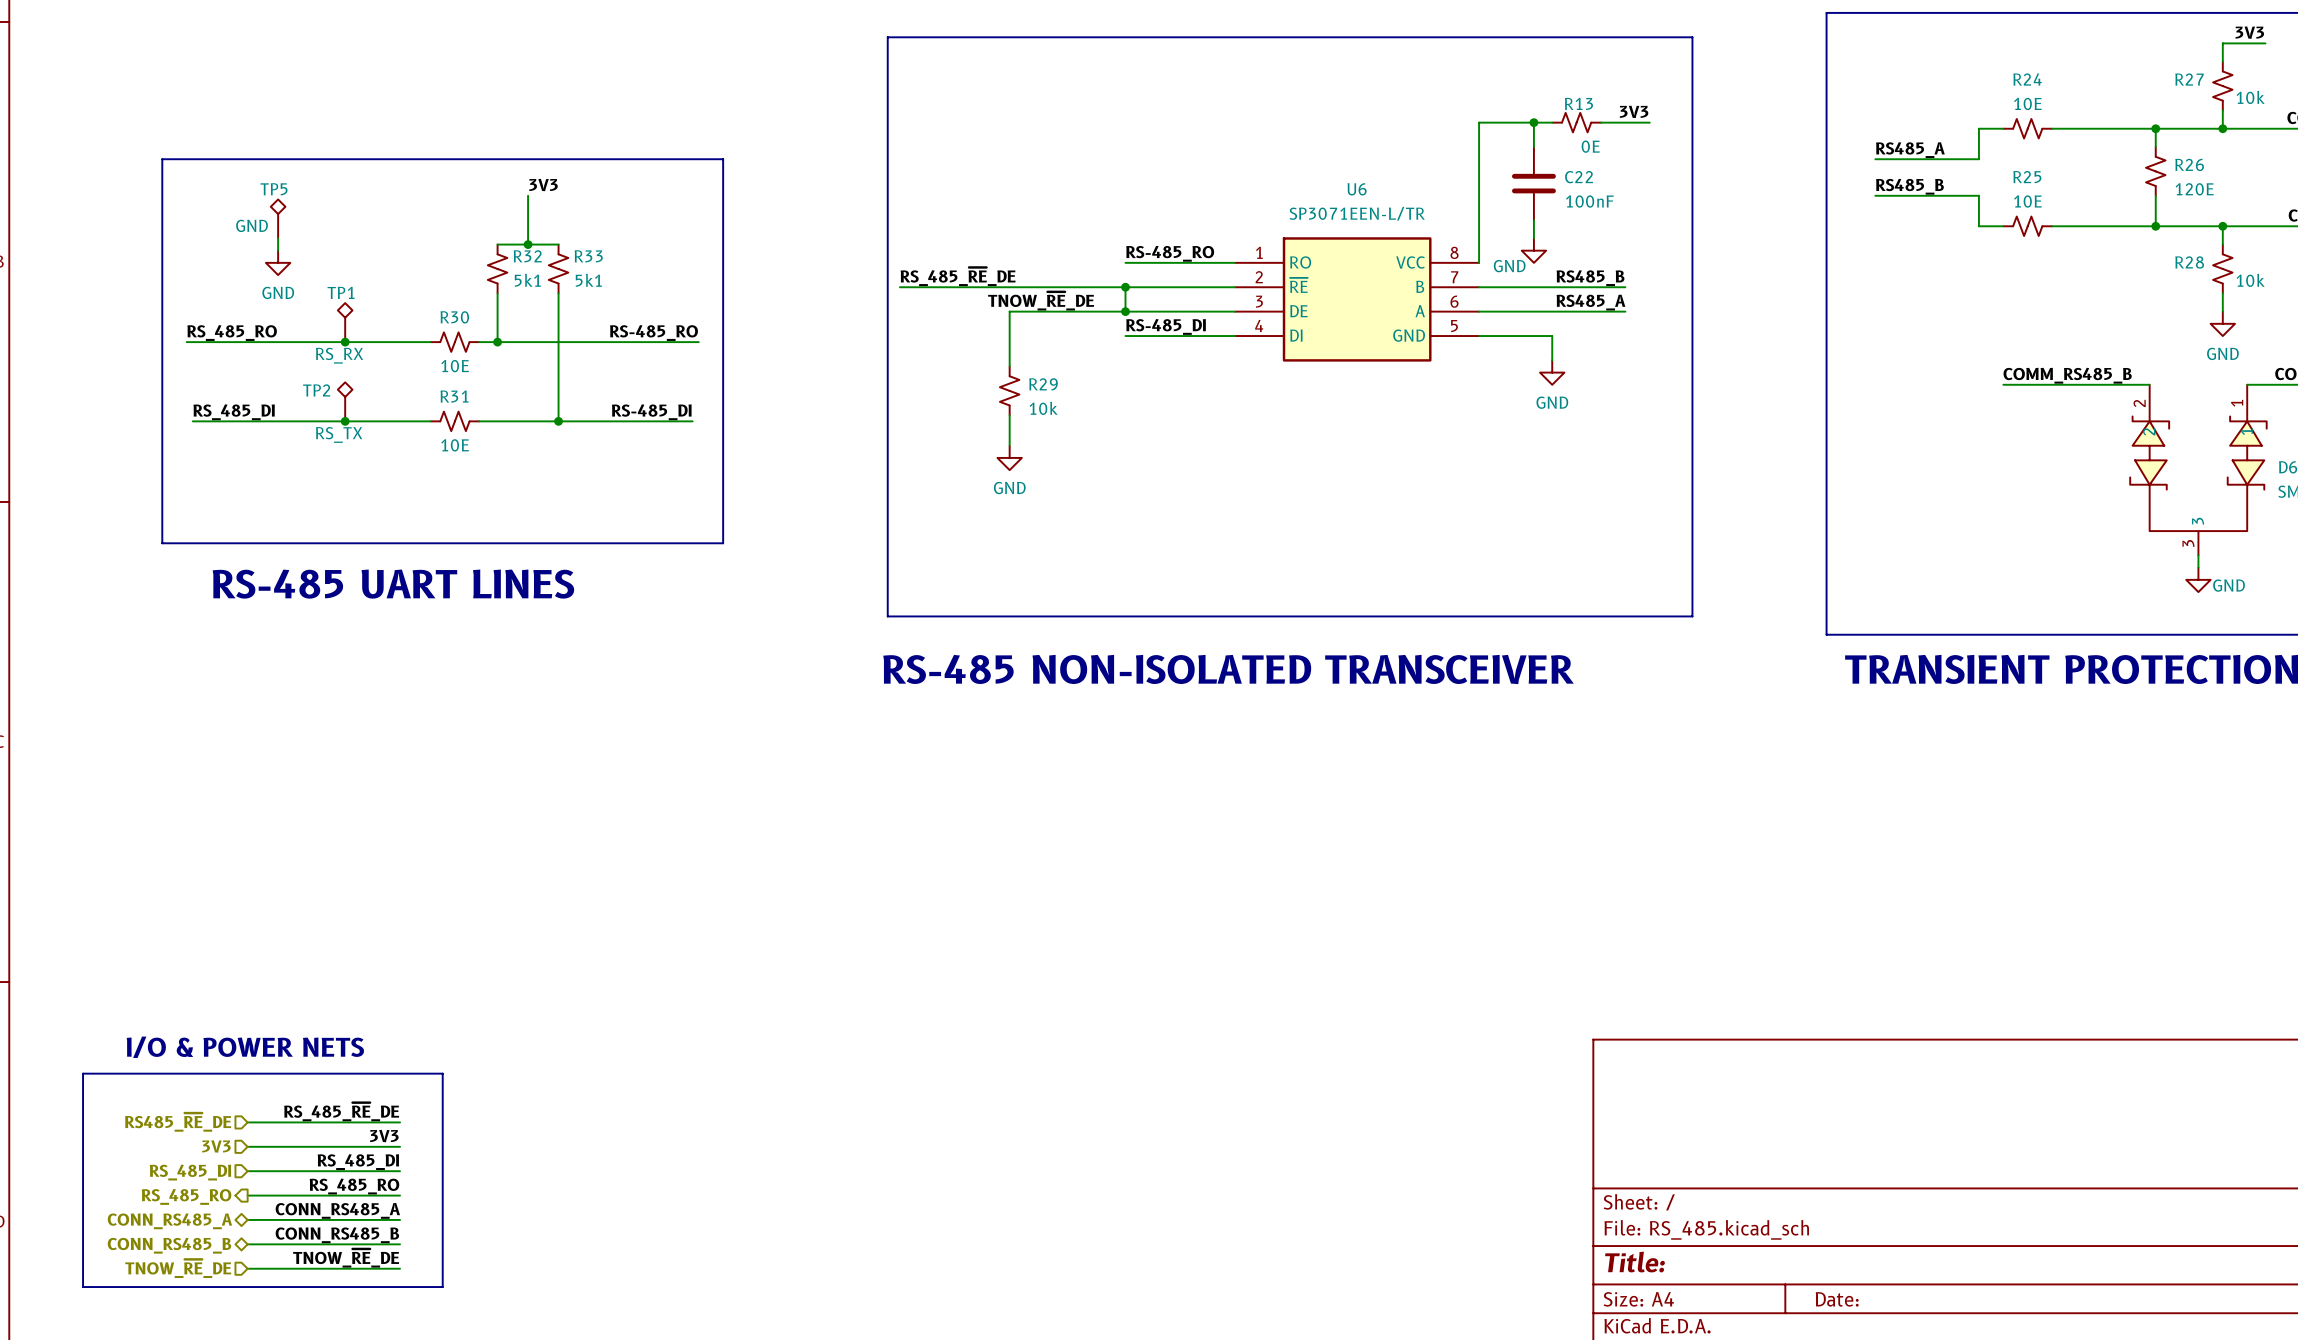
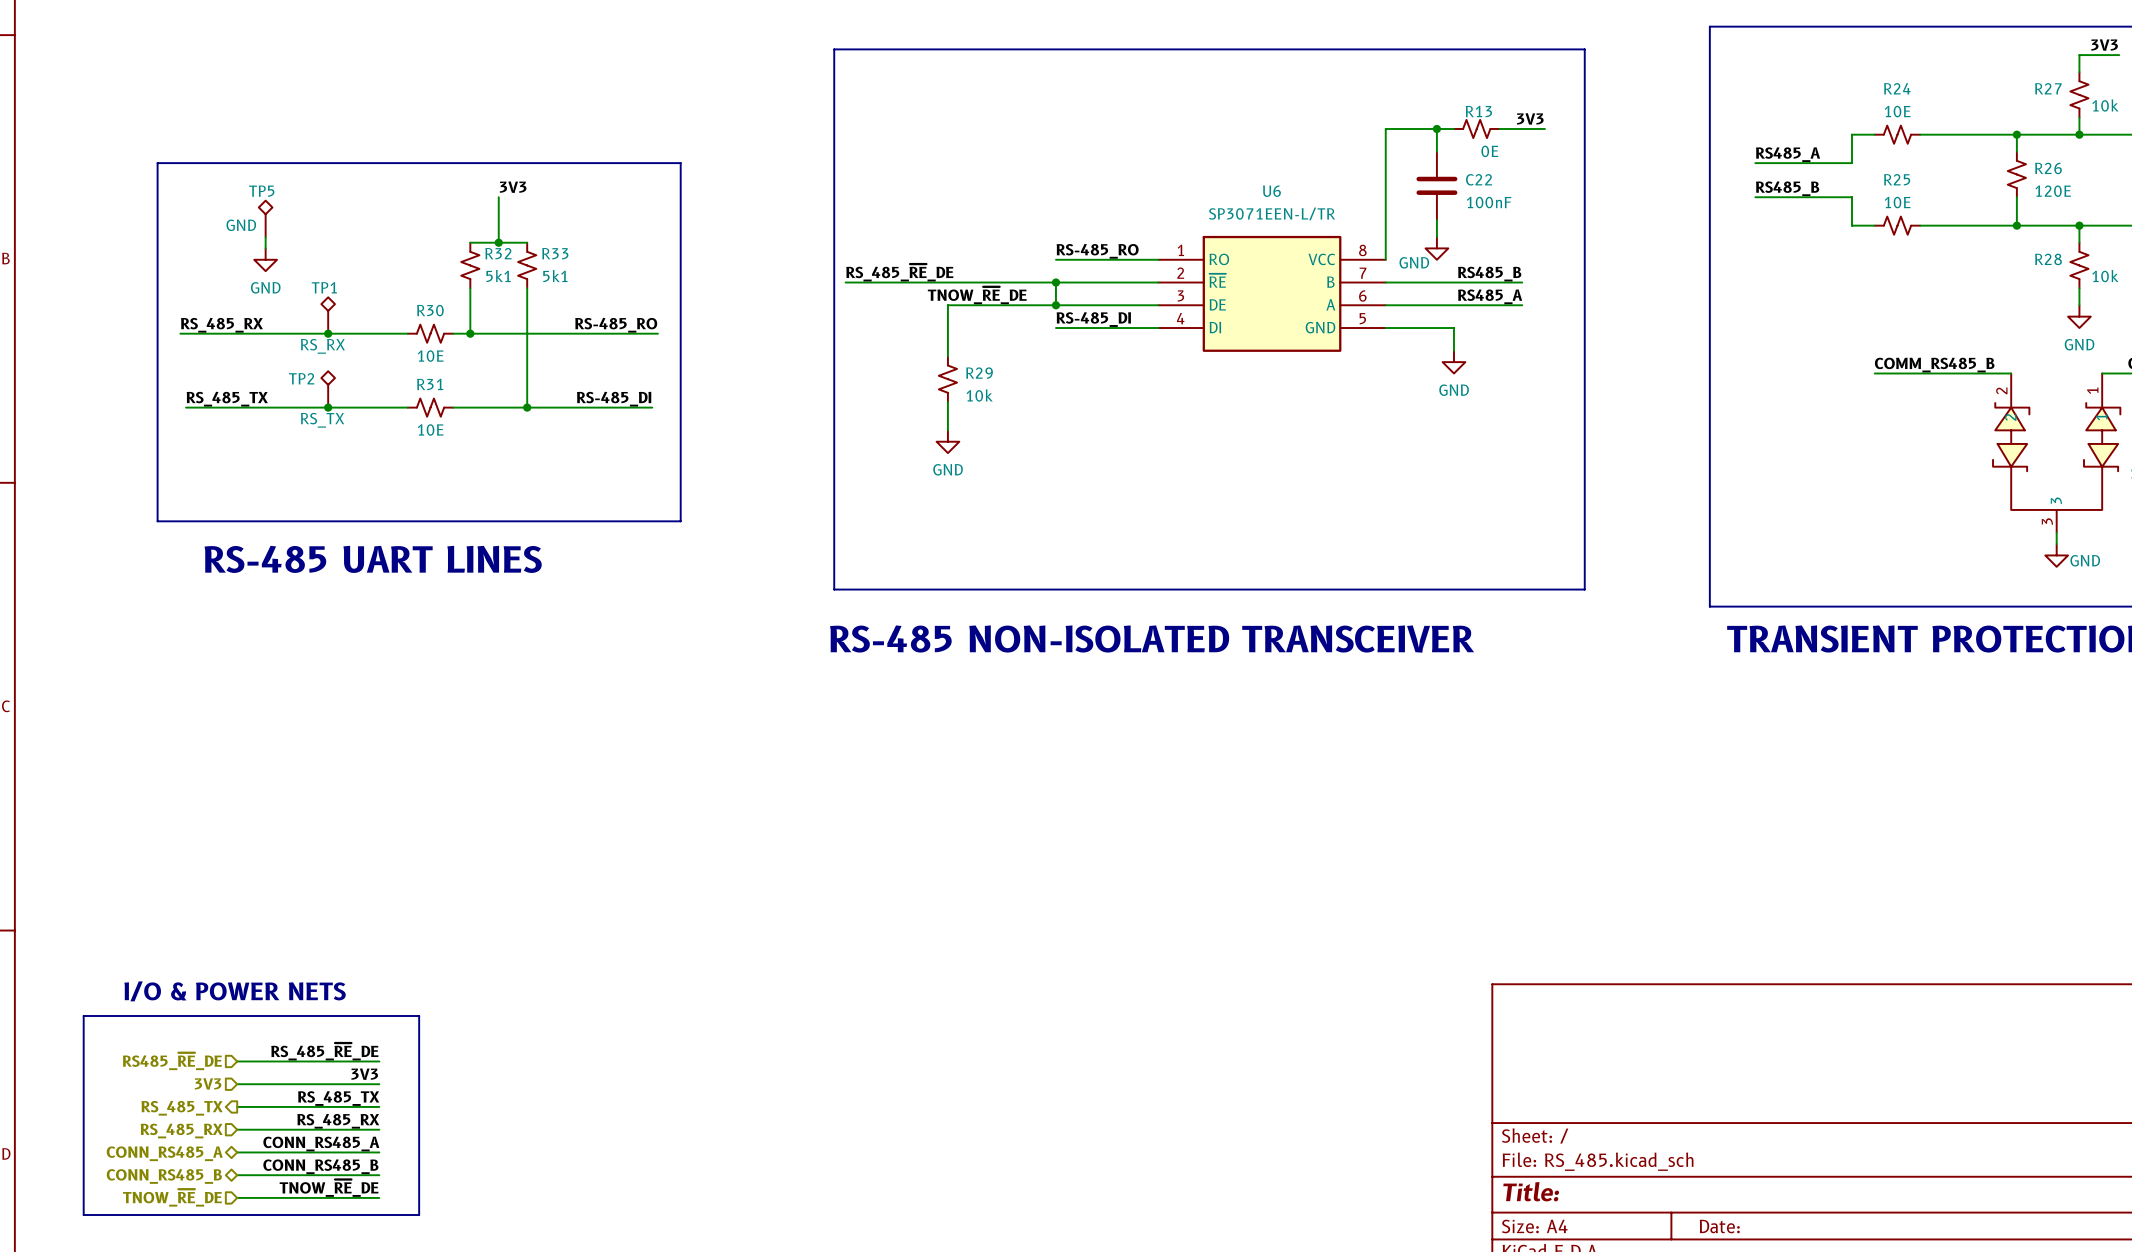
label: RS_485_RO (232, 333) -> RS_485_RX (221, 325)
label: RS_485_DI (234, 412) -> RS_485_TX (227, 399)
label: RS_485_DI (358, 1162) -> RS_485_TX (338, 1098)
hierarchical label shape: input (190, 1172) -> output (182, 1108)
hierarchical label: RS_485_DI (190, 1172) -> RS_485_TX (182, 1108)
label: RS_485_RO (354, 1186) -> RS_485_RX (338, 1121)
hierarchical label shape: output (186, 1196) -> input (181, 1130)
hierarchical label: RS_485_RO (186, 1196) -> RS_485_RX (181, 1130)

